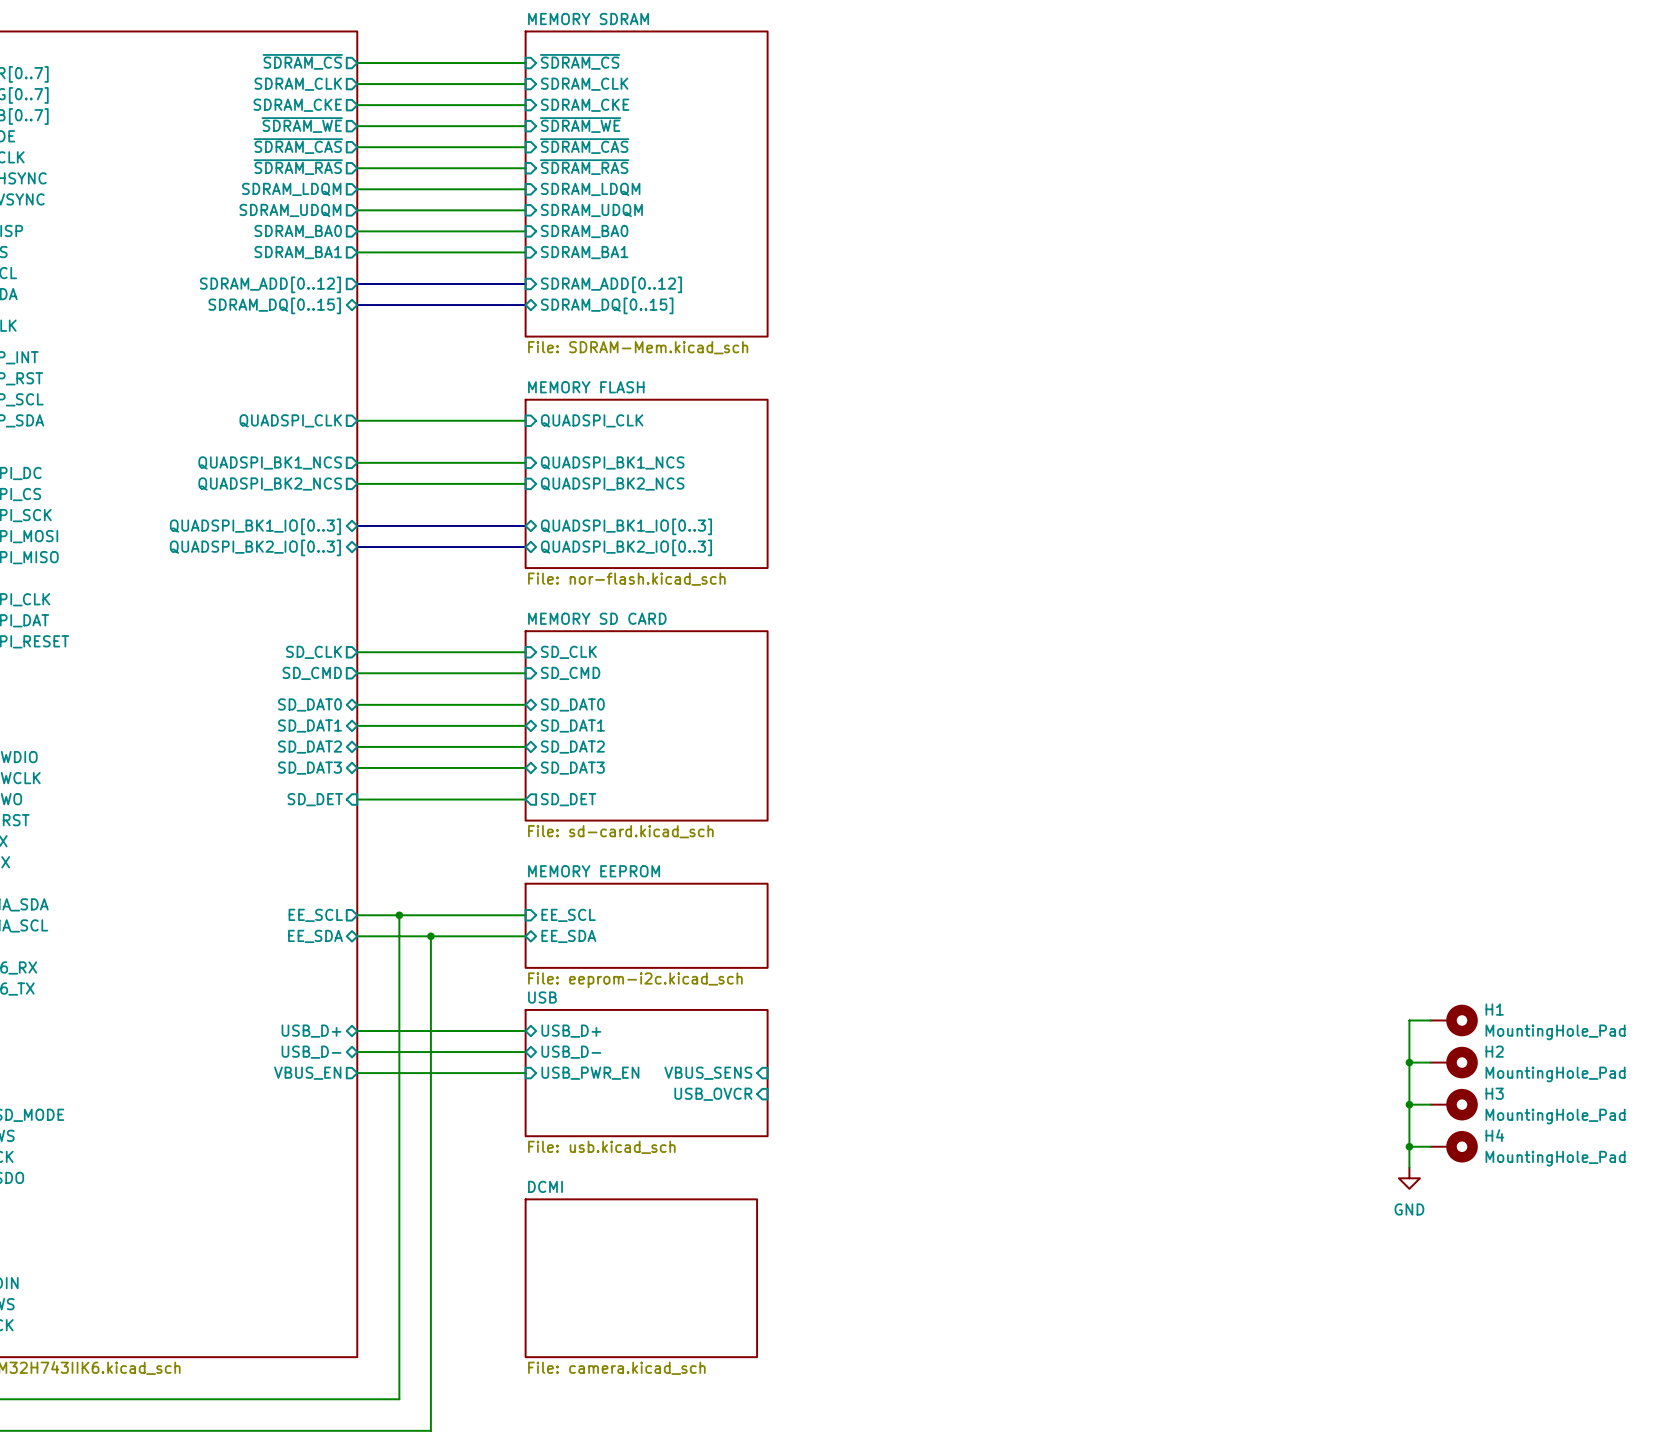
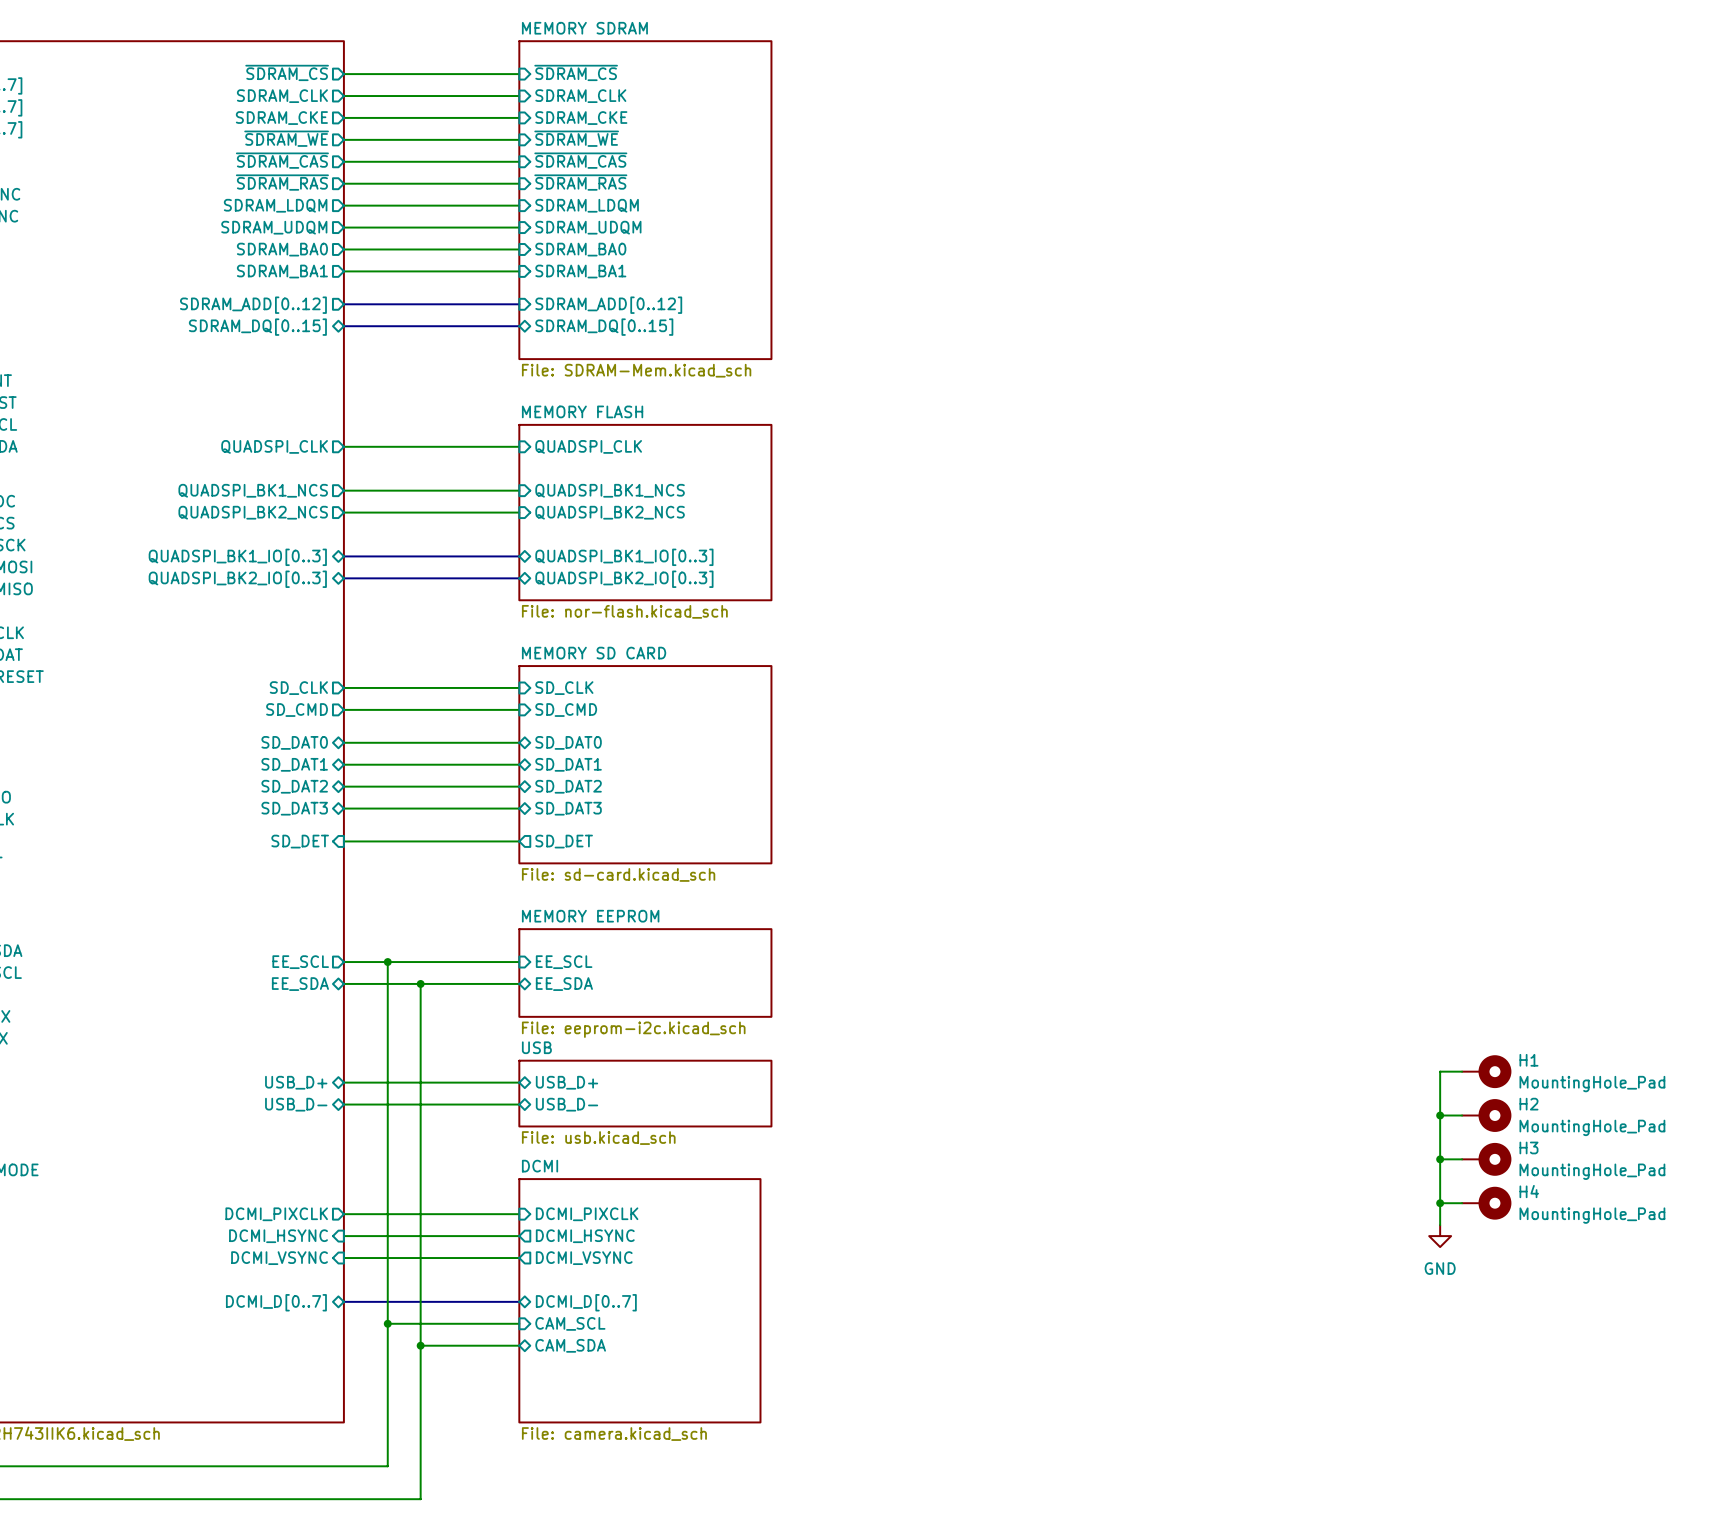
sheet USB: none -> File: usb.kicad_sch (645, 1093)
sheet pin: VBUS_EN (307, 1073) -> none
wire: (357, 1073) (525, 1073) -> (343, 1214) (519, 1214)
sheet pin: USB_PWR_EN (590, 1073) -> none
sheet USB: File: usb.kicad_sch (646, 1073) -> none
sheet pin: VBUS_SENS (708, 1073) -> none
sheet pin: USB_OVCR (713, 1094) -> none
sheet pin: none -> DCMI_PIXCLK (276, 1214)
sheet pin: none -> DCMI_PIXCLK (587, 1214)
sheet pin: none -> DCMI_HSYNC (278, 1236)
wire: none -> (343, 1236) (519, 1236)
sheet pin: none -> DCMI_HSYNC (585, 1236)
sheet pin: none -> DCMI_VSYNC (279, 1258)
wire: none -> (343, 1258) (519, 1258)
sheet pin: none -> DCMI_VSYNC (584, 1258)
sheet DCMI: none -> File: camera.kicad_sch (639, 1300)
bus: none -> (343, 1301) (519, 1301)
sheet pin: none -> DCMI_D[0..7] (276, 1302)
sheet pin: none -> DCMI_D[0..7] (586, 1302)
wire: none -> (387, 1323) (519, 1323)
junction: none -> (387, 1323)
sheet pin: none -> CAM_SCL (570, 1323)
sheet DCMI: File: camera.kicad_sch (641, 1278) -> none
wire: none -> (420, 1345) (519, 1345)
junction: none -> (420, 1345)
sheet pin: none -> CAM_SDA (570, 1345)

